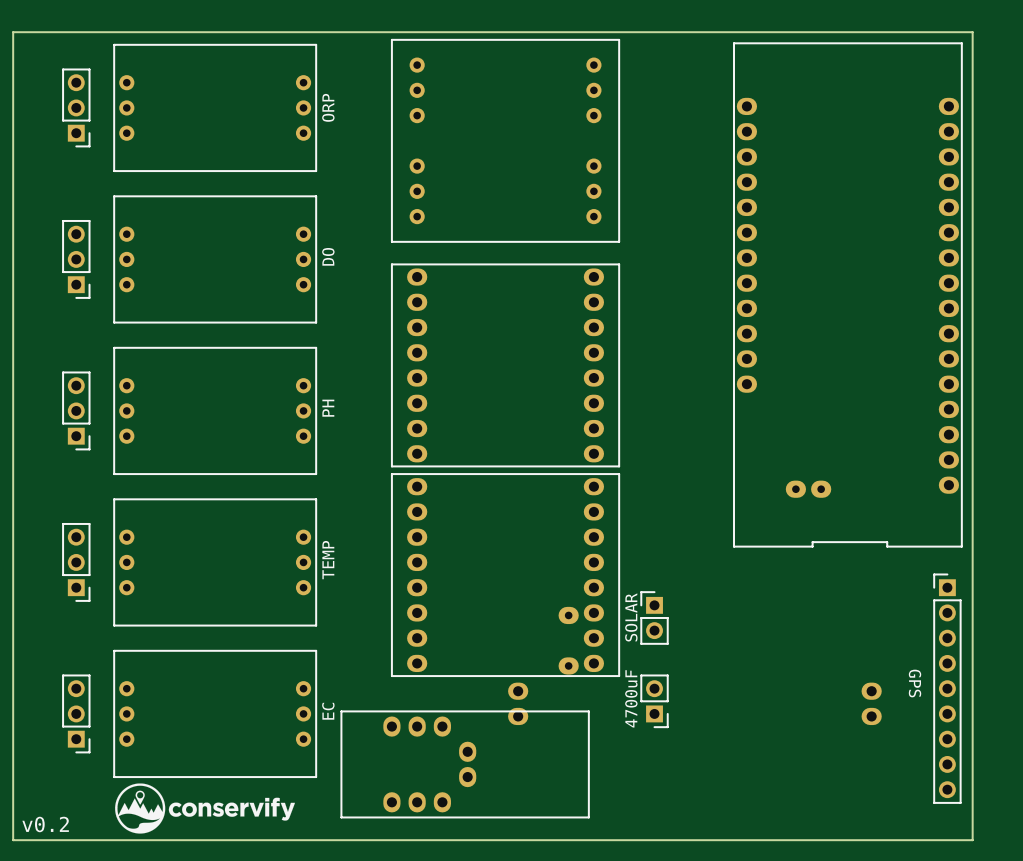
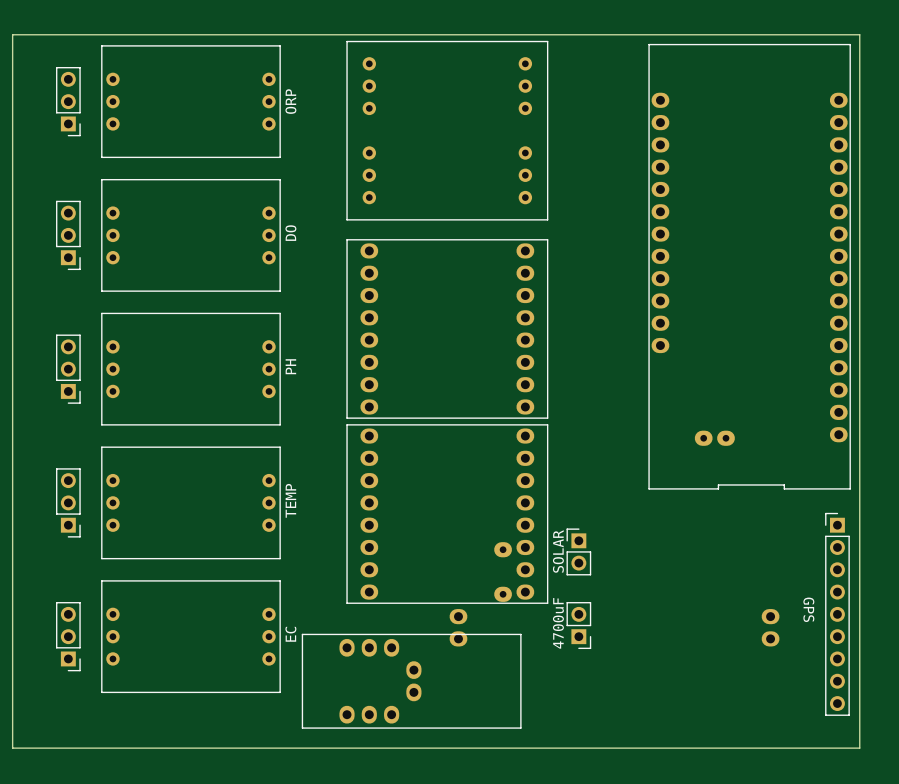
drawing: [115, 783, 296, 834] -> none
text: v0.2 (45, 824) -> none

